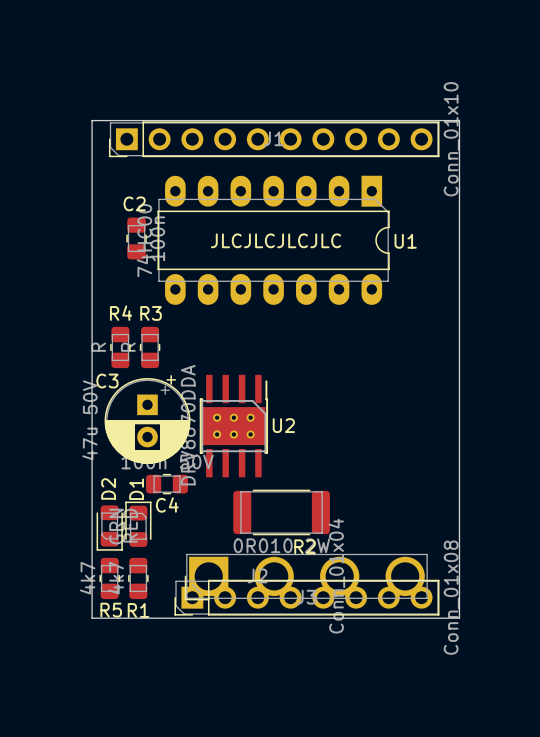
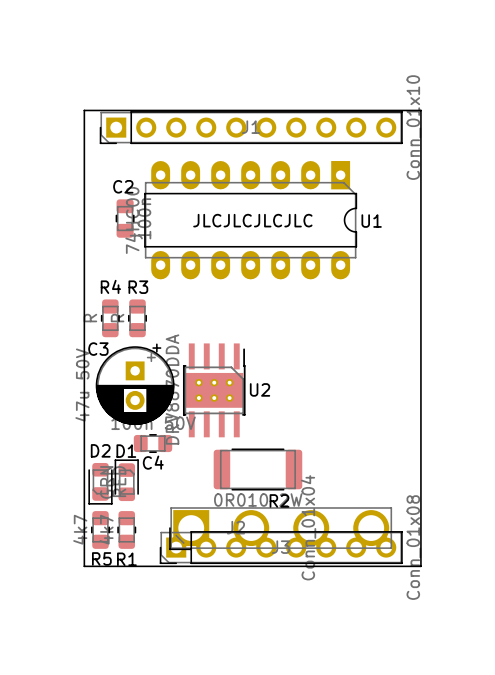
D2 name rotation: 0° (108, 488) -> 90° clockwise (100, 450)
D1 name rotation: 0° (136, 489) -> 90° clockwise (126, 451)

